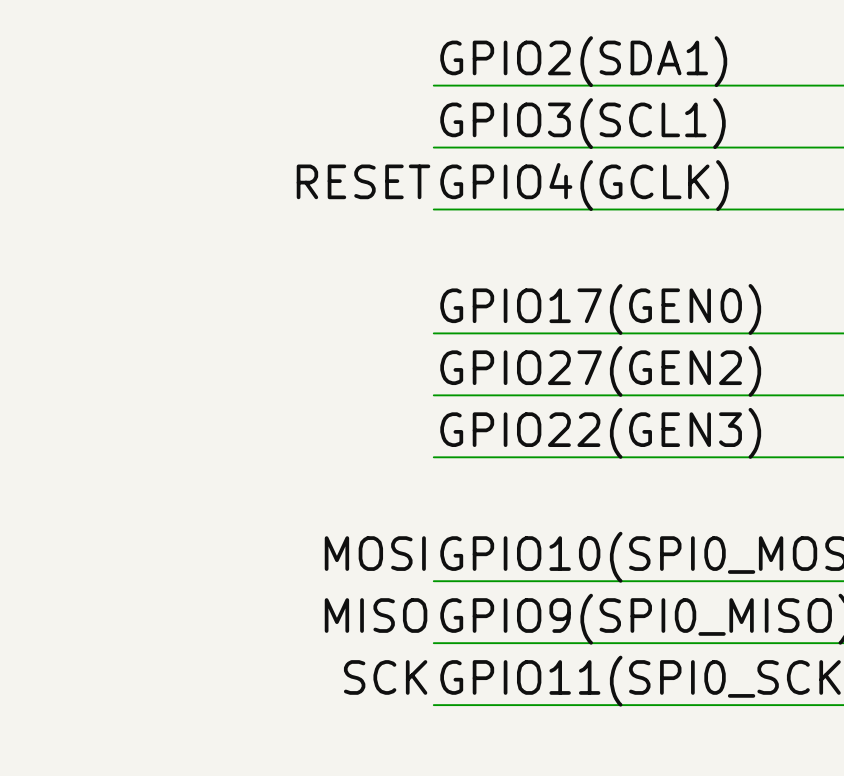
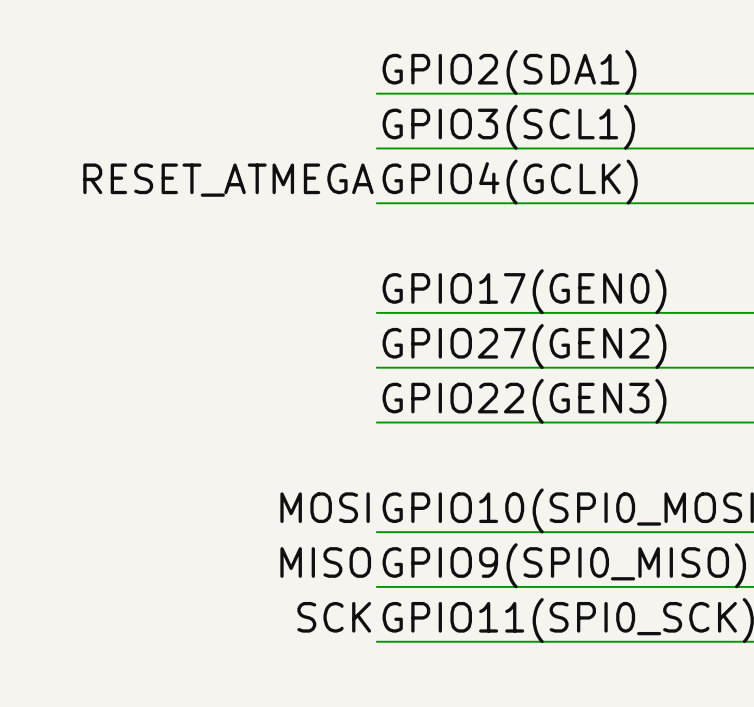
label: RESET (363, 181) -> RESET_ATMEGA (228, 180)

